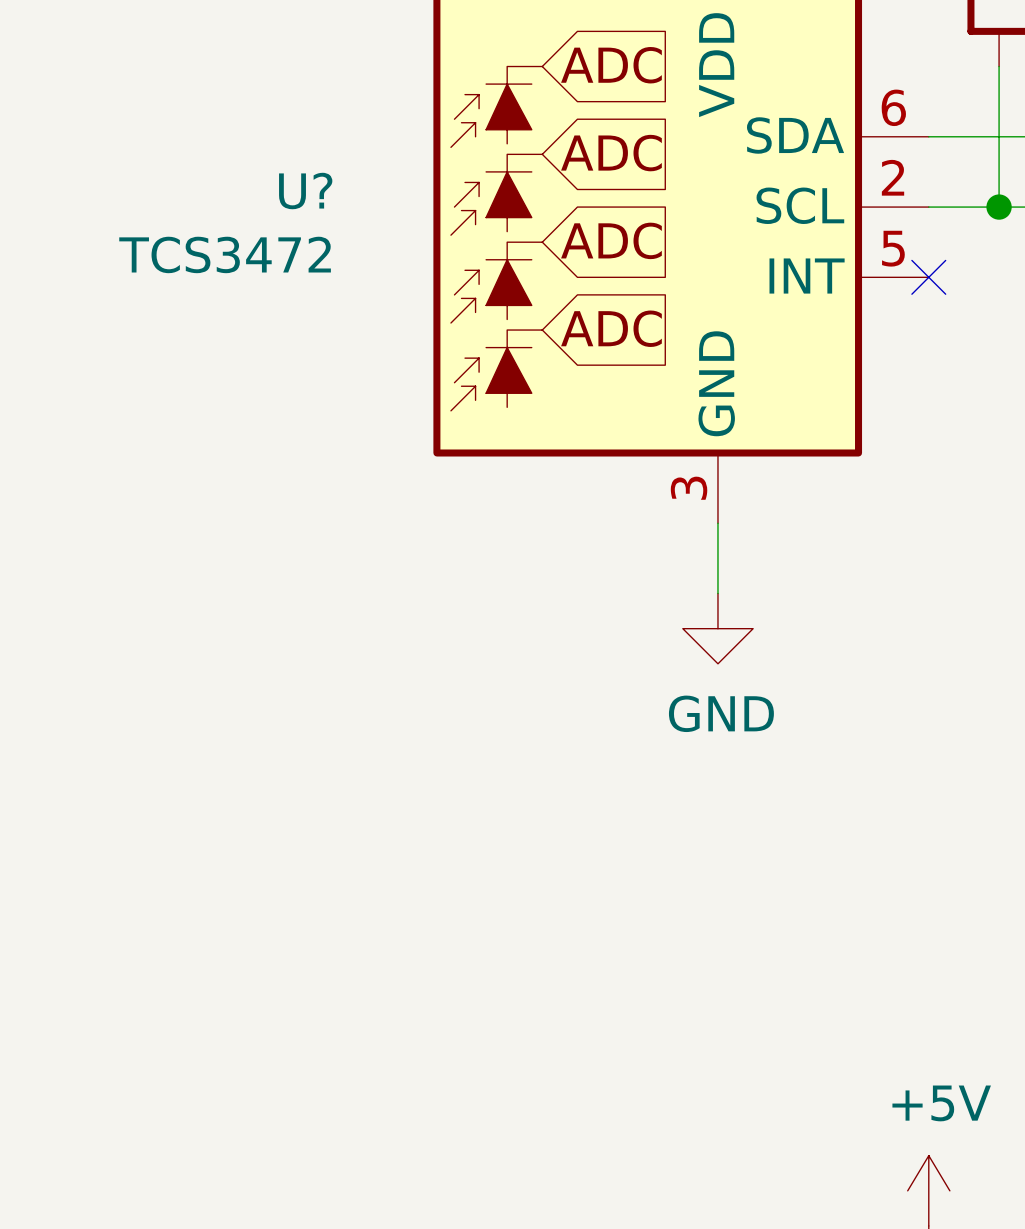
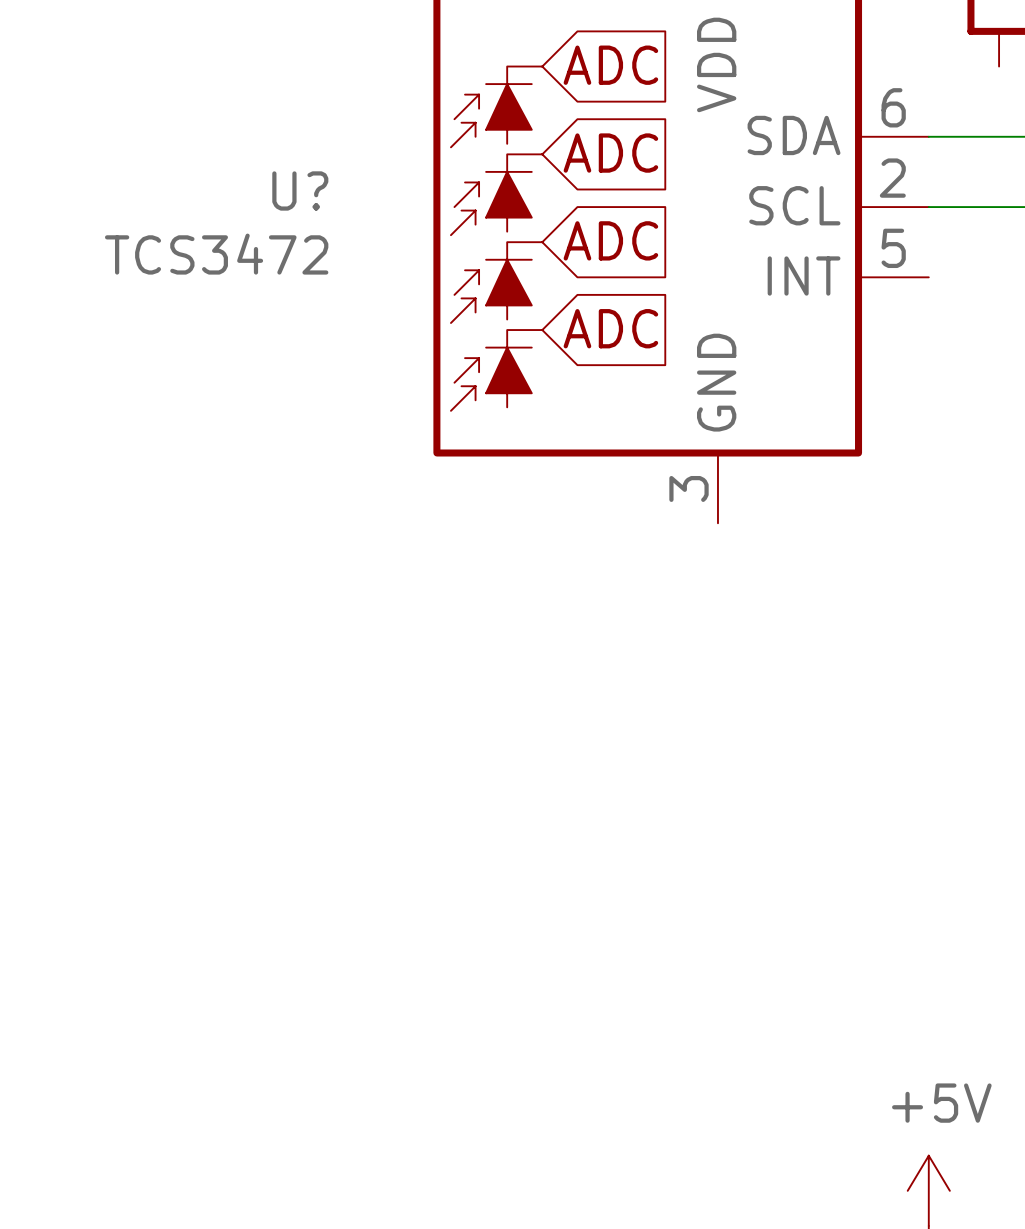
wire: (999, 66) (999, 207) -> none
junction: (999, 207) -> none
no-connect mark: (928, 277) -> none
wire: (717, 523) (717, 593) -> none
power symbol: GND (717, 628) -> none

